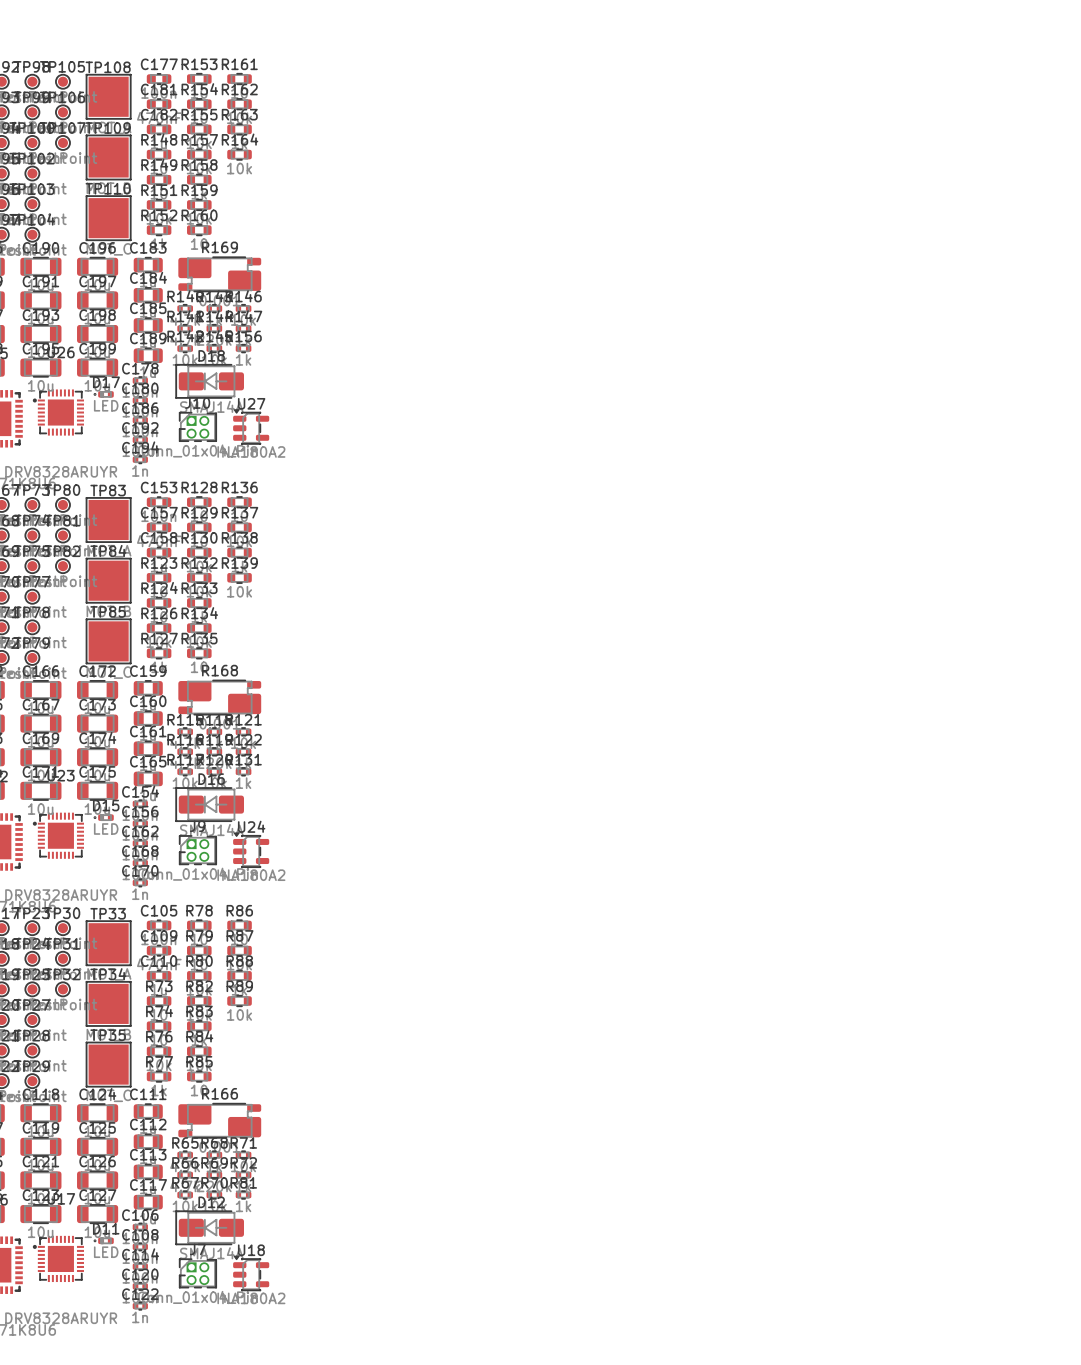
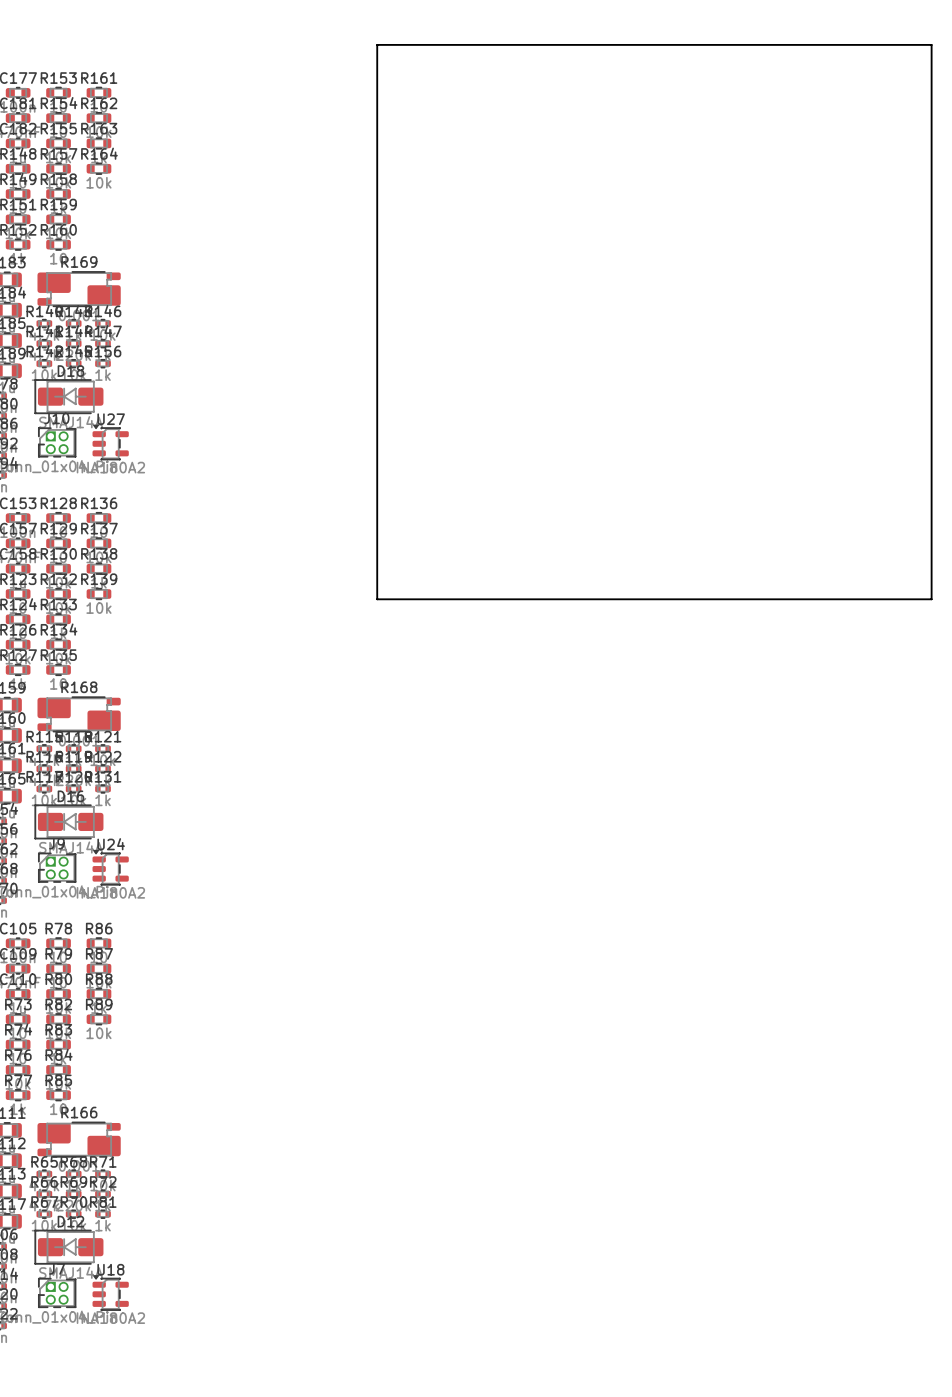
board edge: none -> (377, 44) (377, 599) (931, 599) (931, 44) (377, 44)

